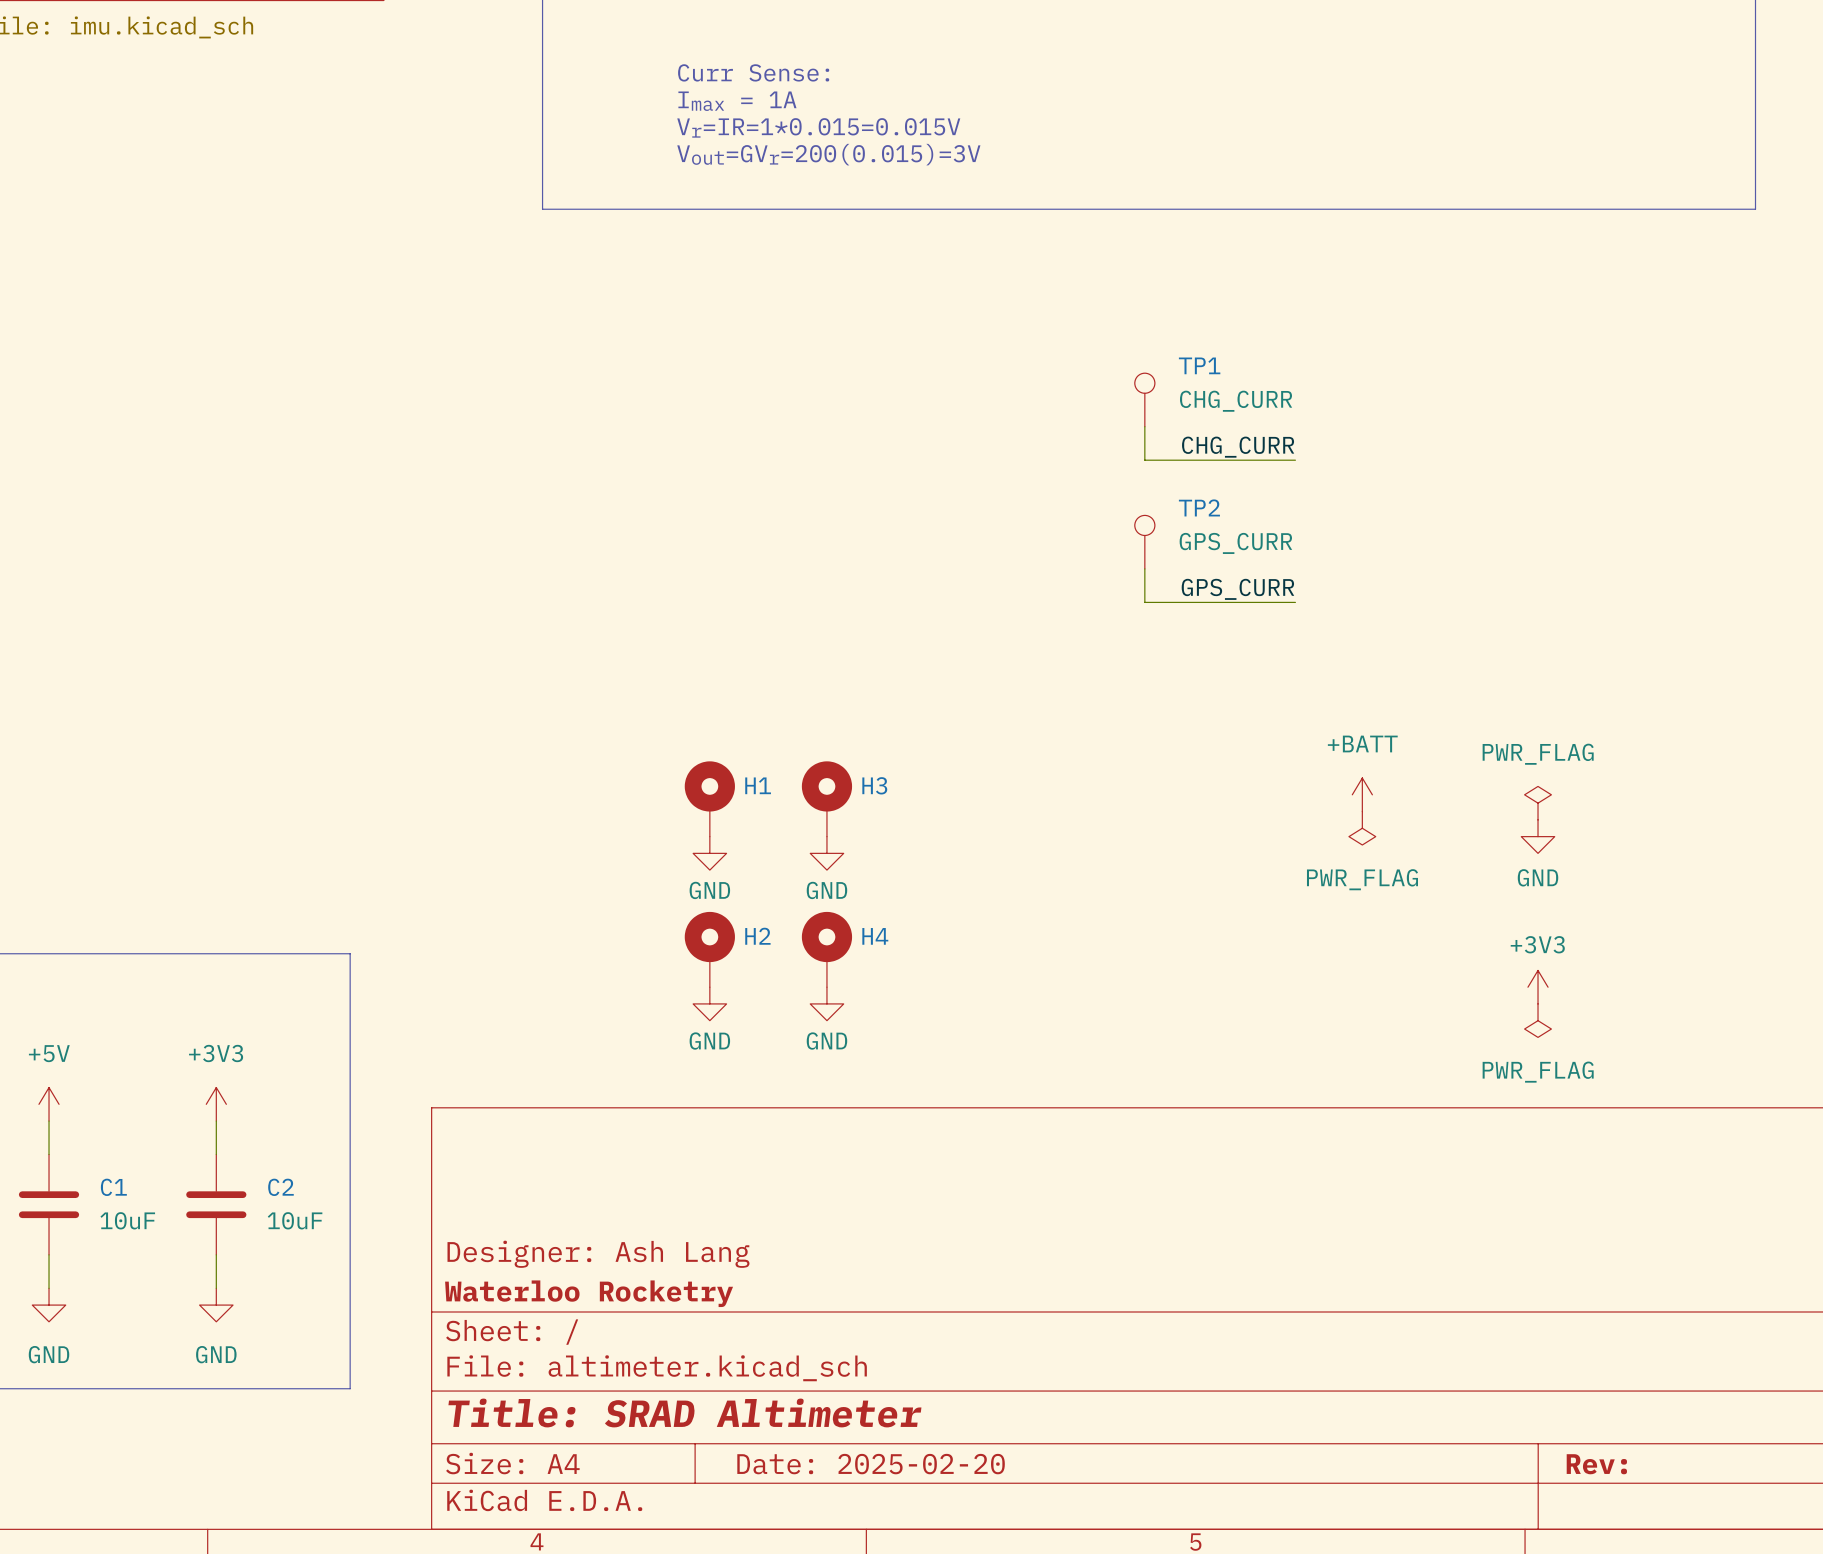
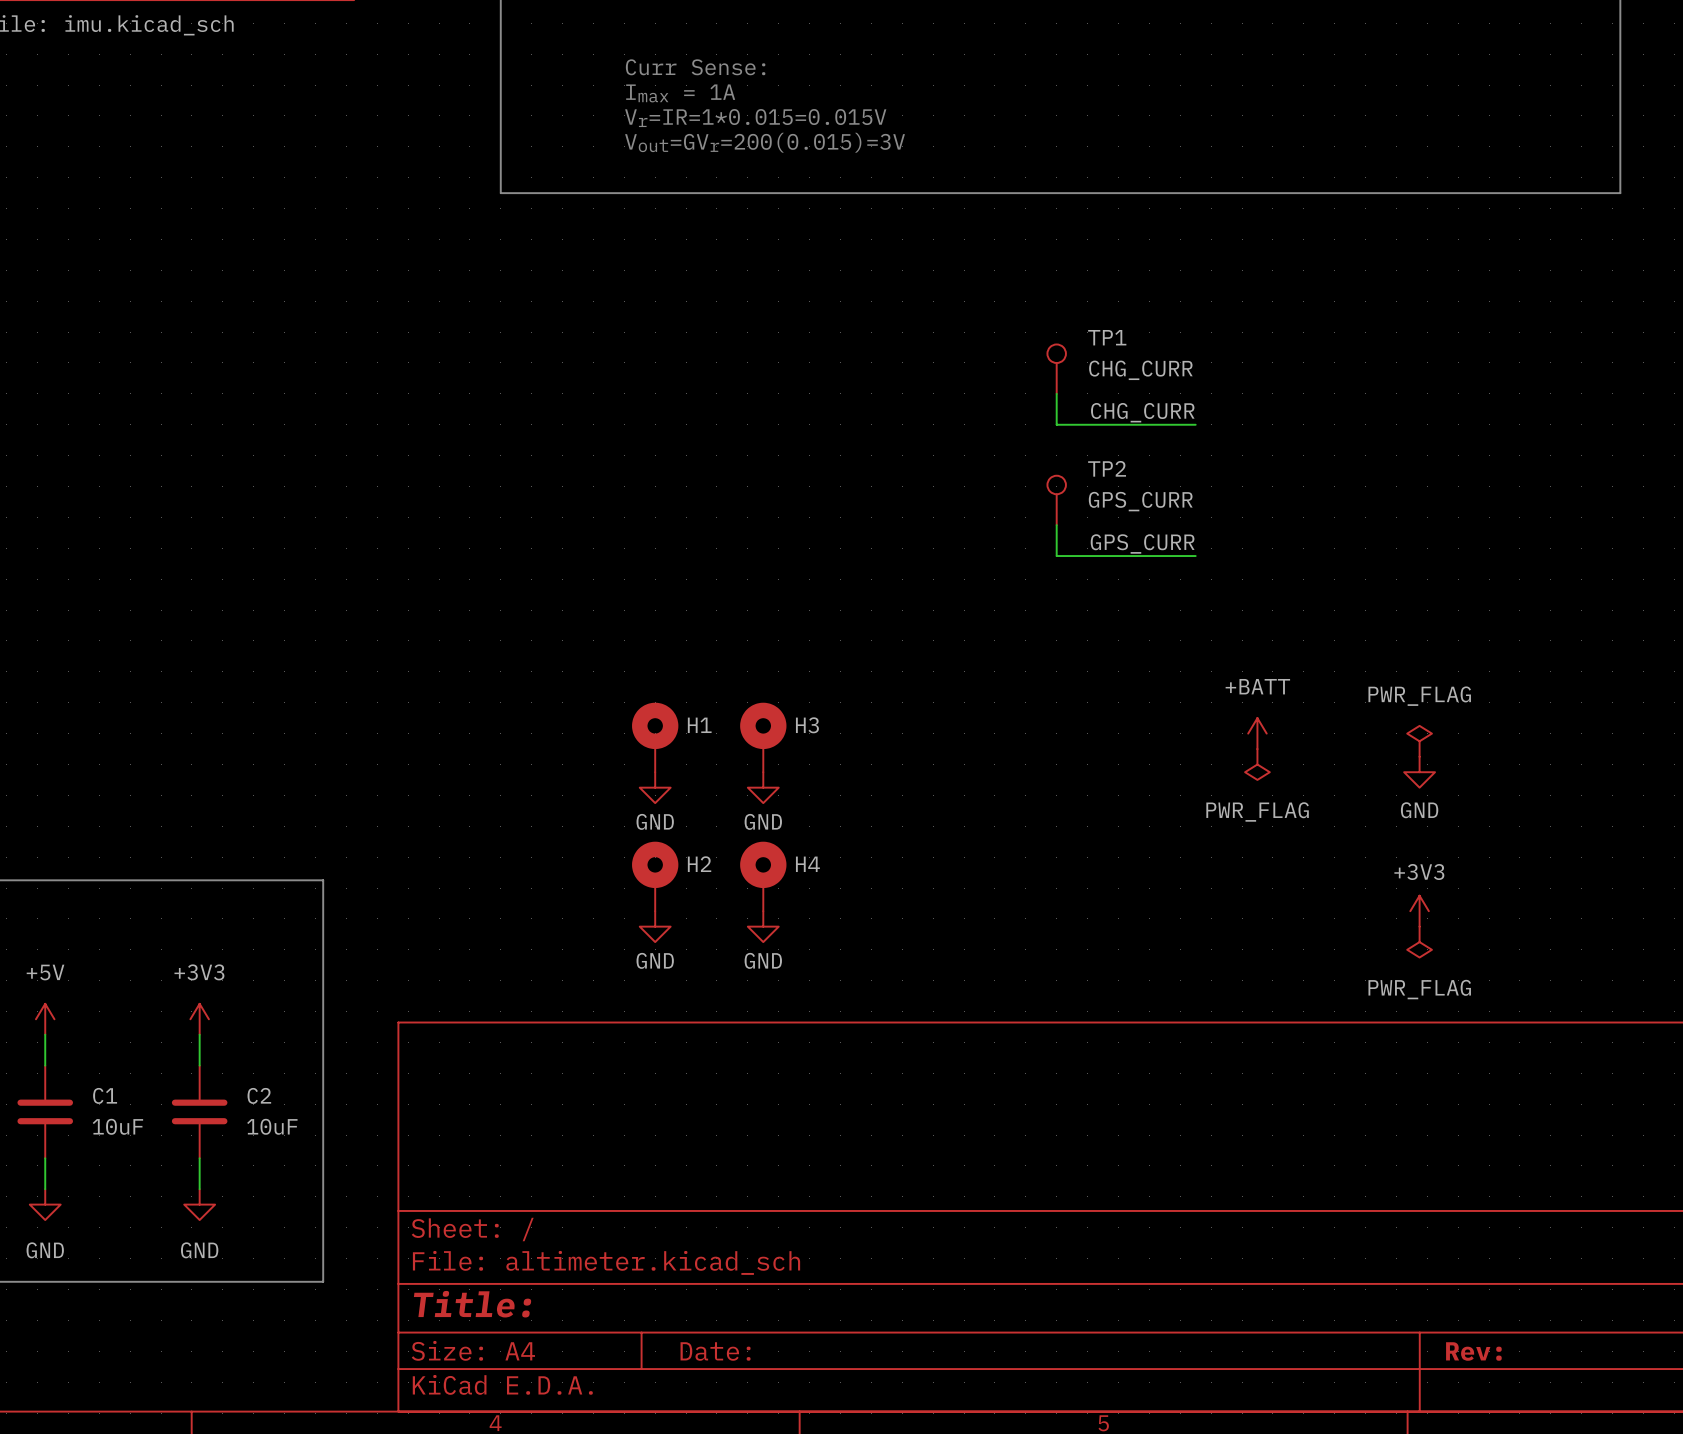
title block: Designer: Ash Lang (598, 1254) -> none
title block: Waterloo Rocketry (589, 1293) -> none
title block: Title: SRAD Altimeter (684, 1412) -> Title: (472, 1304)
title block: Date: 2025-02-20 (871, 1464) -> Date: (715, 1351)

